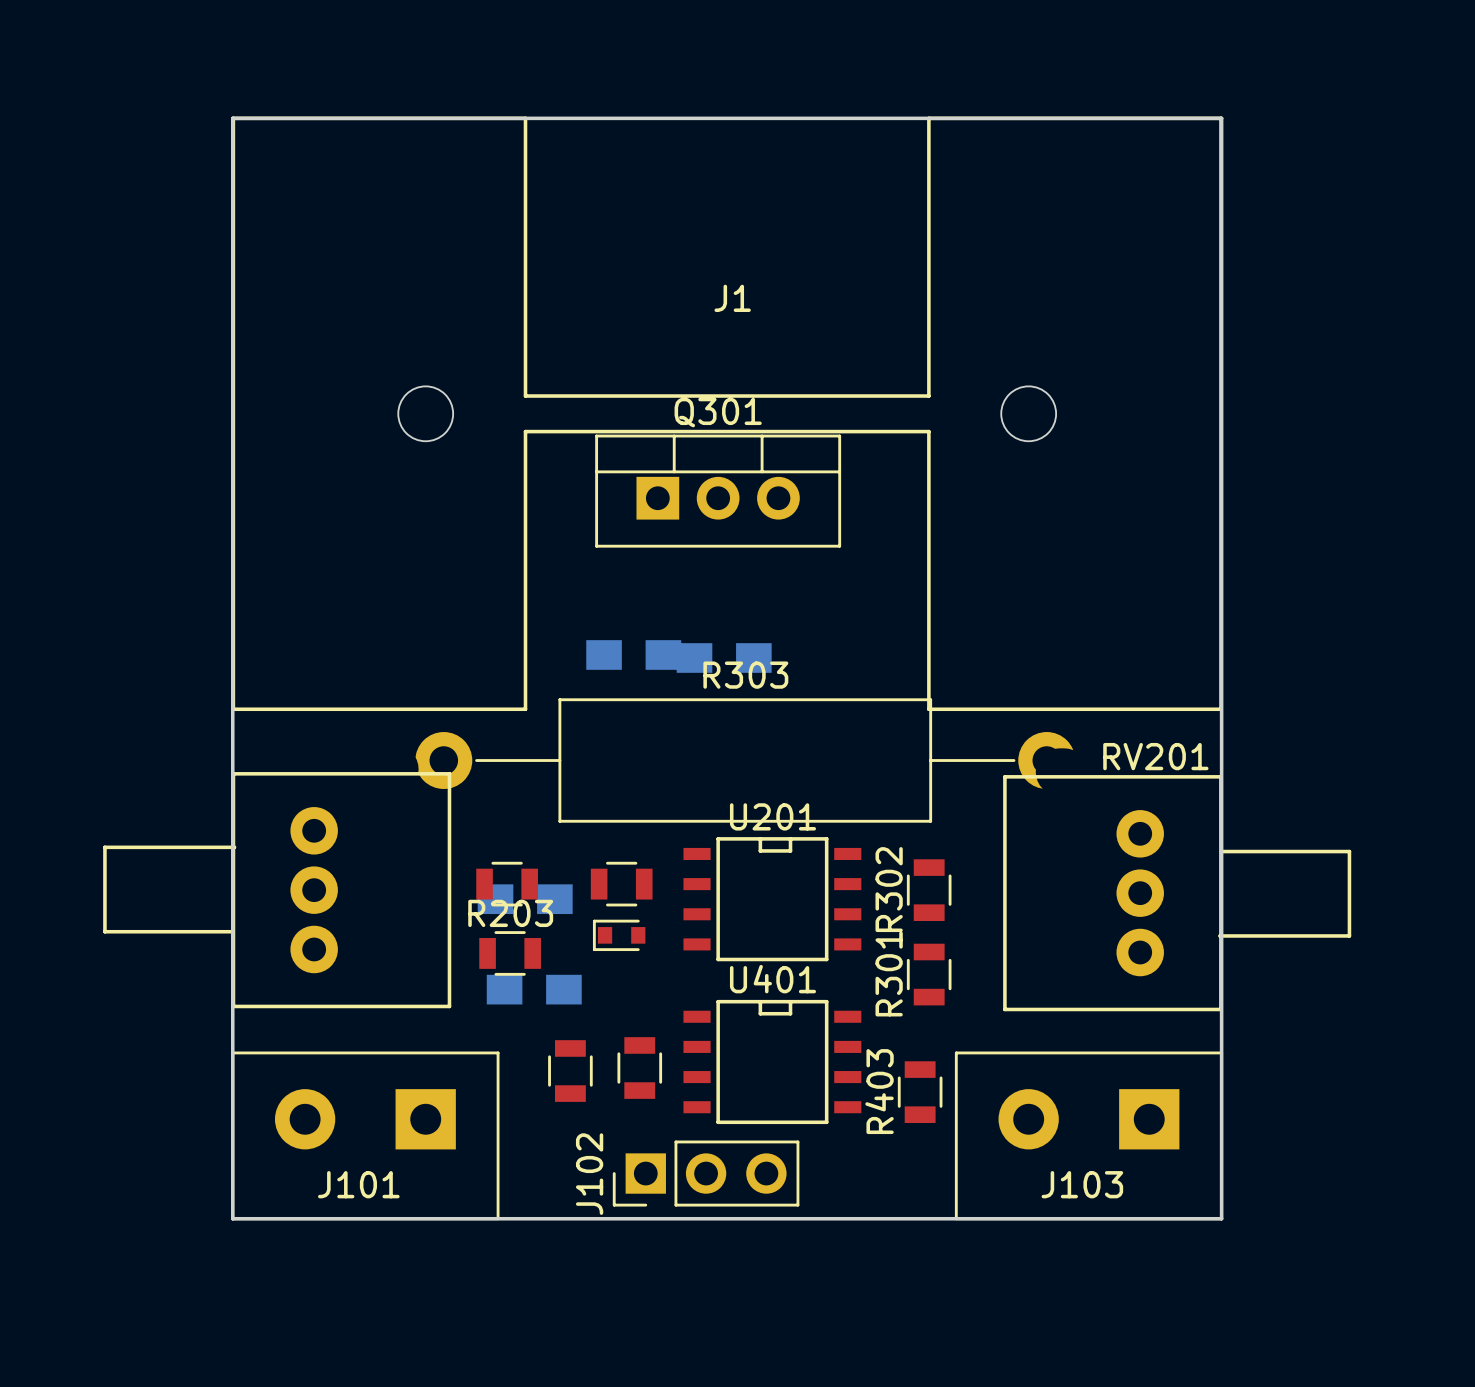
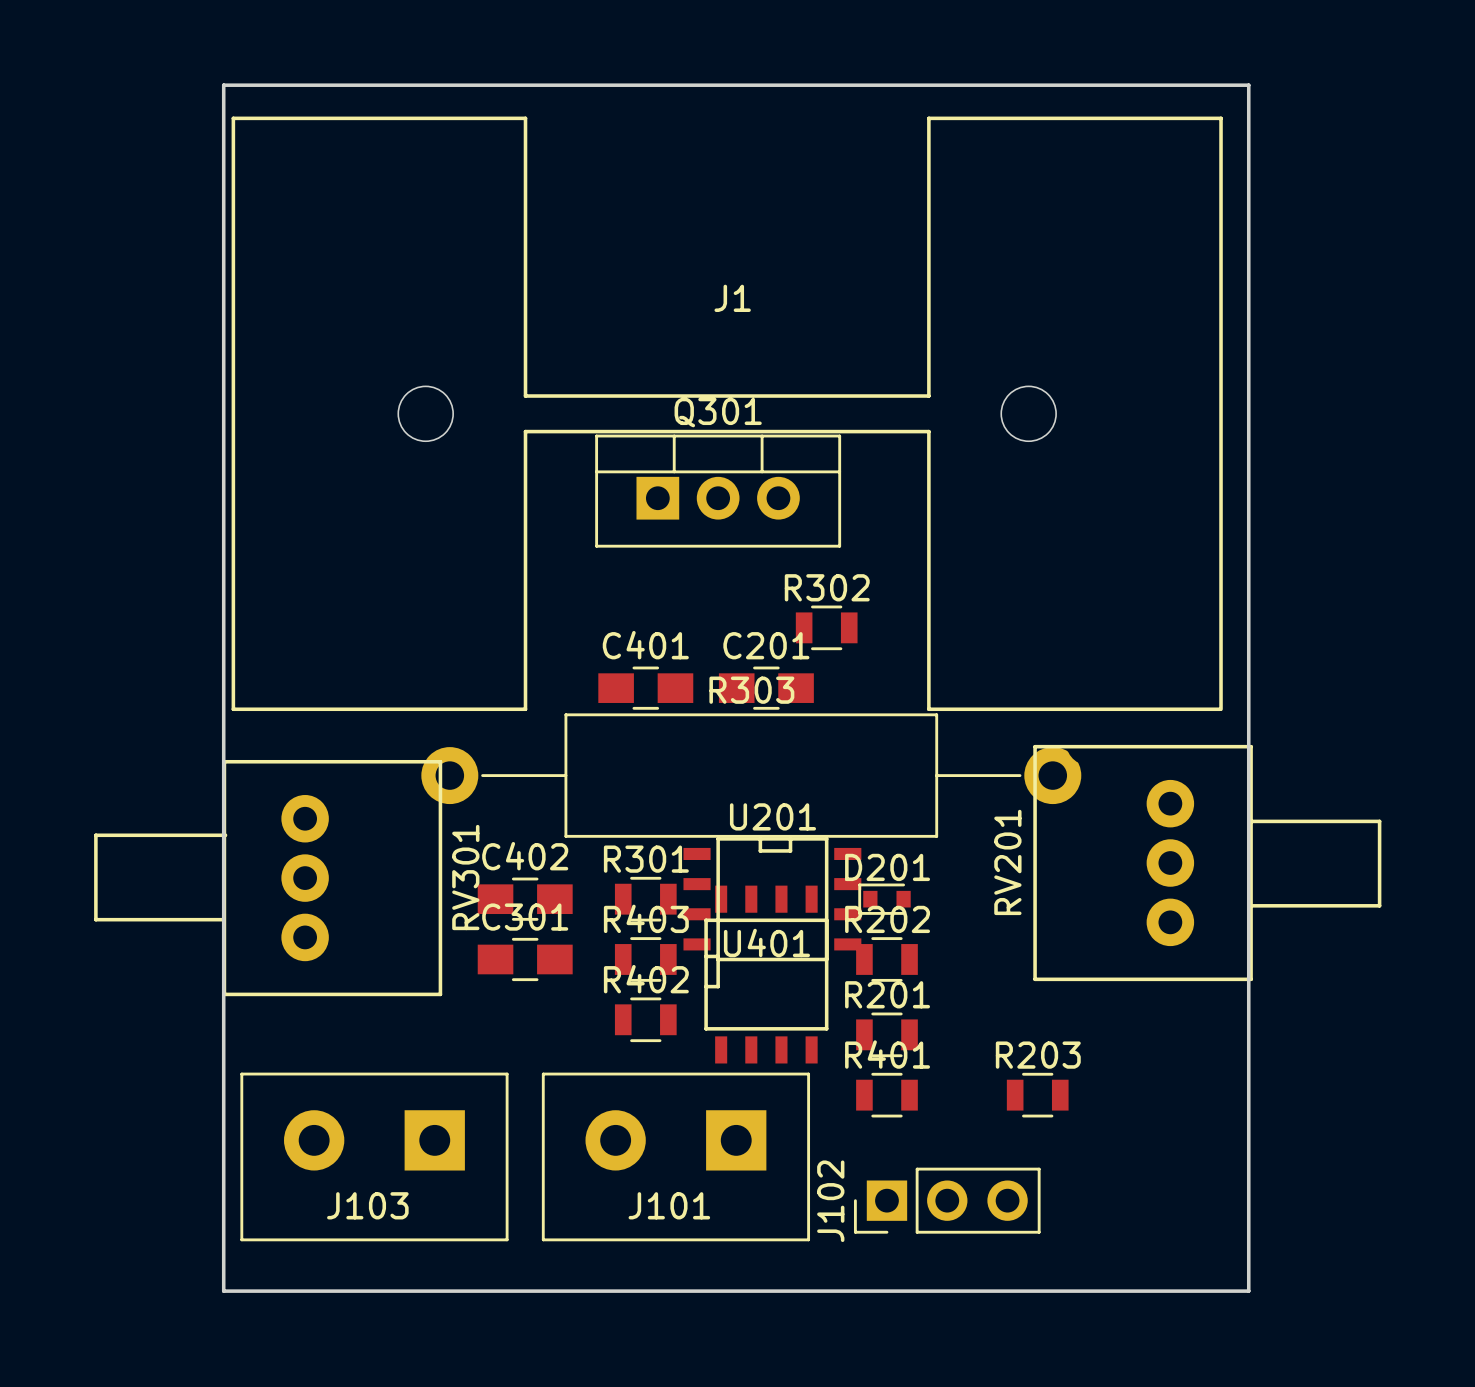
board edge: (232, 118) (232, 1218) (1221, 1218) (1221, 118) (232, 118) -> (223, 85) (223, 1291) (1248, 1291) (1248, 85) (223, 85)
C401 side: bottom (633, 654) -> top (645, 688)
C201 side: bottom (724, 658) -> top (766, 688)
RV201 name rotation: 0° (1155, 756) -> 90° counterclockwise (1007, 862)
RV201 name position: RV201 (1155, 756) -> RV201 (1007, 862)
R303 position: (745, 760) -> (751, 775)
RV301 name: none -> RV301 (465, 877)
part: (507, 884) -> none
part: (621, 884) -> none
RV301 position: (277, 890) -> (268, 878)
R302 rotation: 0° (929, 890) -> 90° clockwise (826, 627)
R302 position: (929, 890) -> (826, 627)
RV201 position: (1177, 893) -> (1207, 863)
C402 side: bottom (525, 899) -> top (525, 899)
D201: none -> (884, 899)
part: (619, 935) -> none
R203 position: (510, 953) -> (1037, 1095)
R202: none -> (886, 959)
R301 rotation: 0° (929, 974) -> 90° clockwise (645, 899)
R301 position: (929, 974) -> (645, 899)
U401 name position: U401 (772, 979) -> U401 (766, 942)
C301 side: bottom (534, 989) -> top (525, 959)
R402: none -> (645, 1019)
R201: none -> (886, 1034)
U401 rotation: 0° (772, 1061) -> 90° counterclockwise (766, 974)
part: (639, 1068) -> none
part: (570, 1071) -> none
R403 rotation: 0° (920, 1092) -> 90° clockwise (645, 959)
R403 position: (920, 1092) -> (645, 959)
R401: none -> (886, 1095)
J101 position: (365, 1135) -> (675, 1156)
J103 position: (1088, 1135) -> (374, 1156)
J102 position: (706, 1173) -> (947, 1200)

